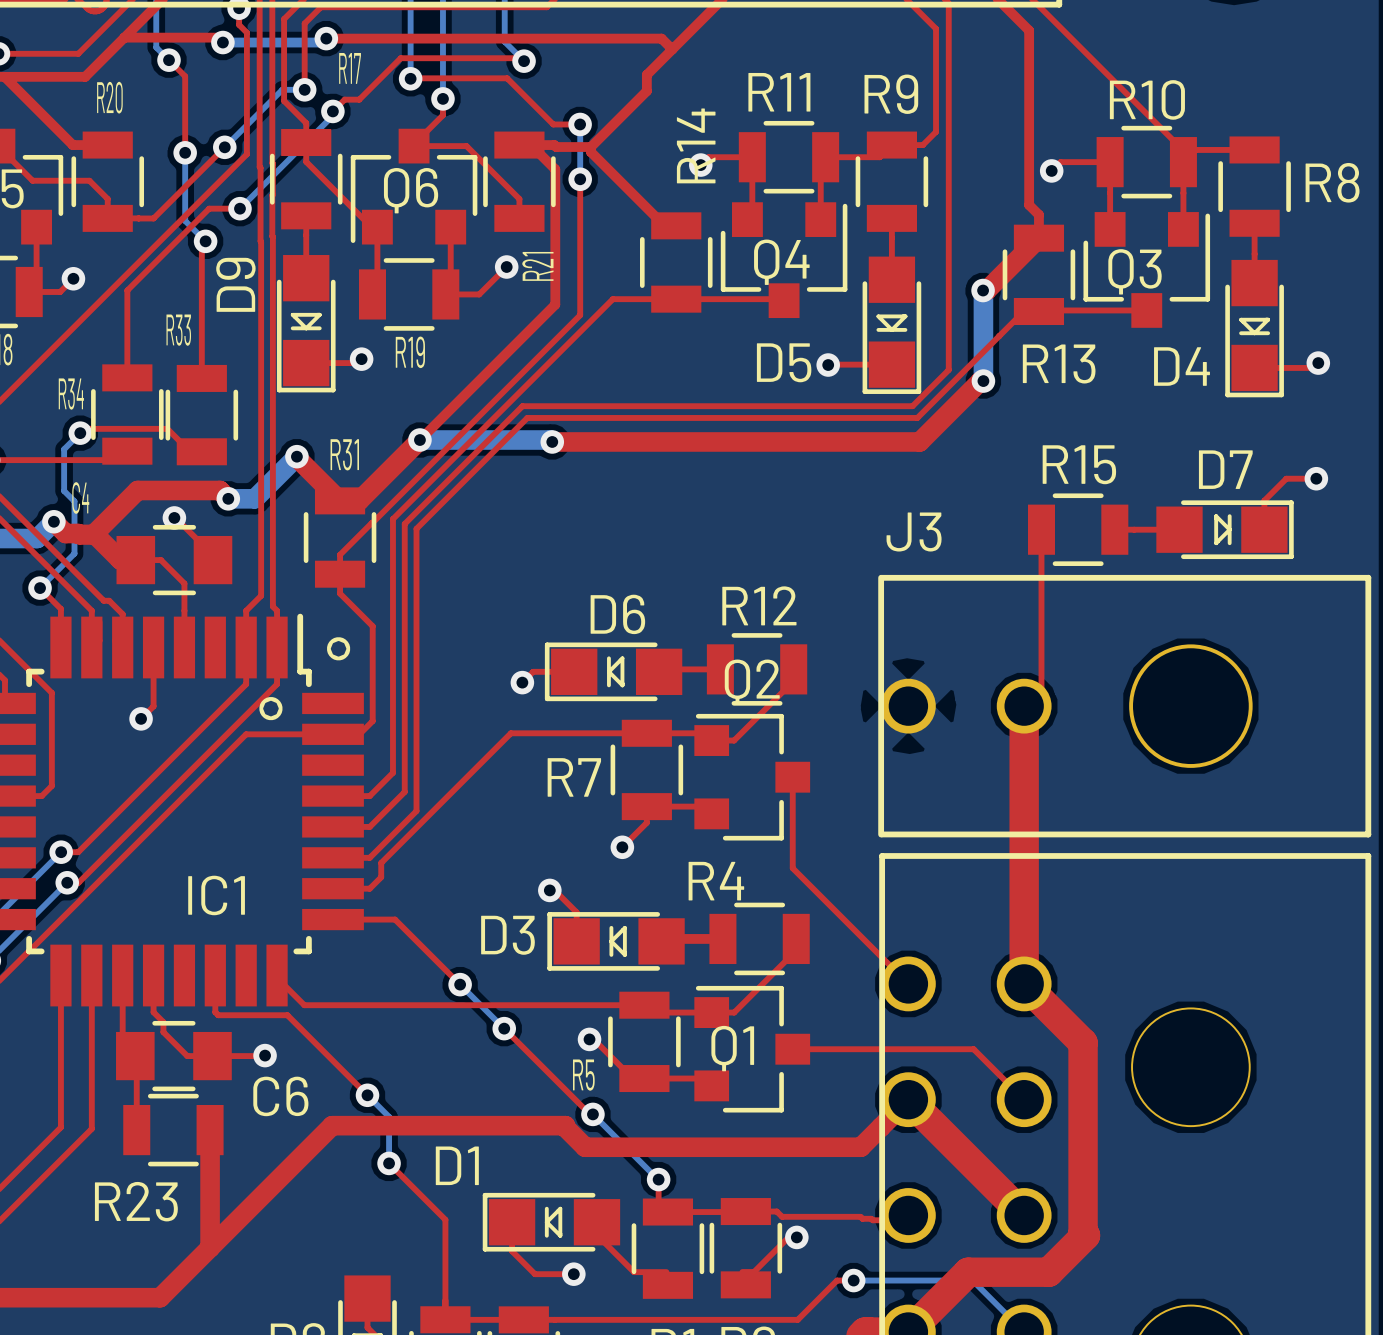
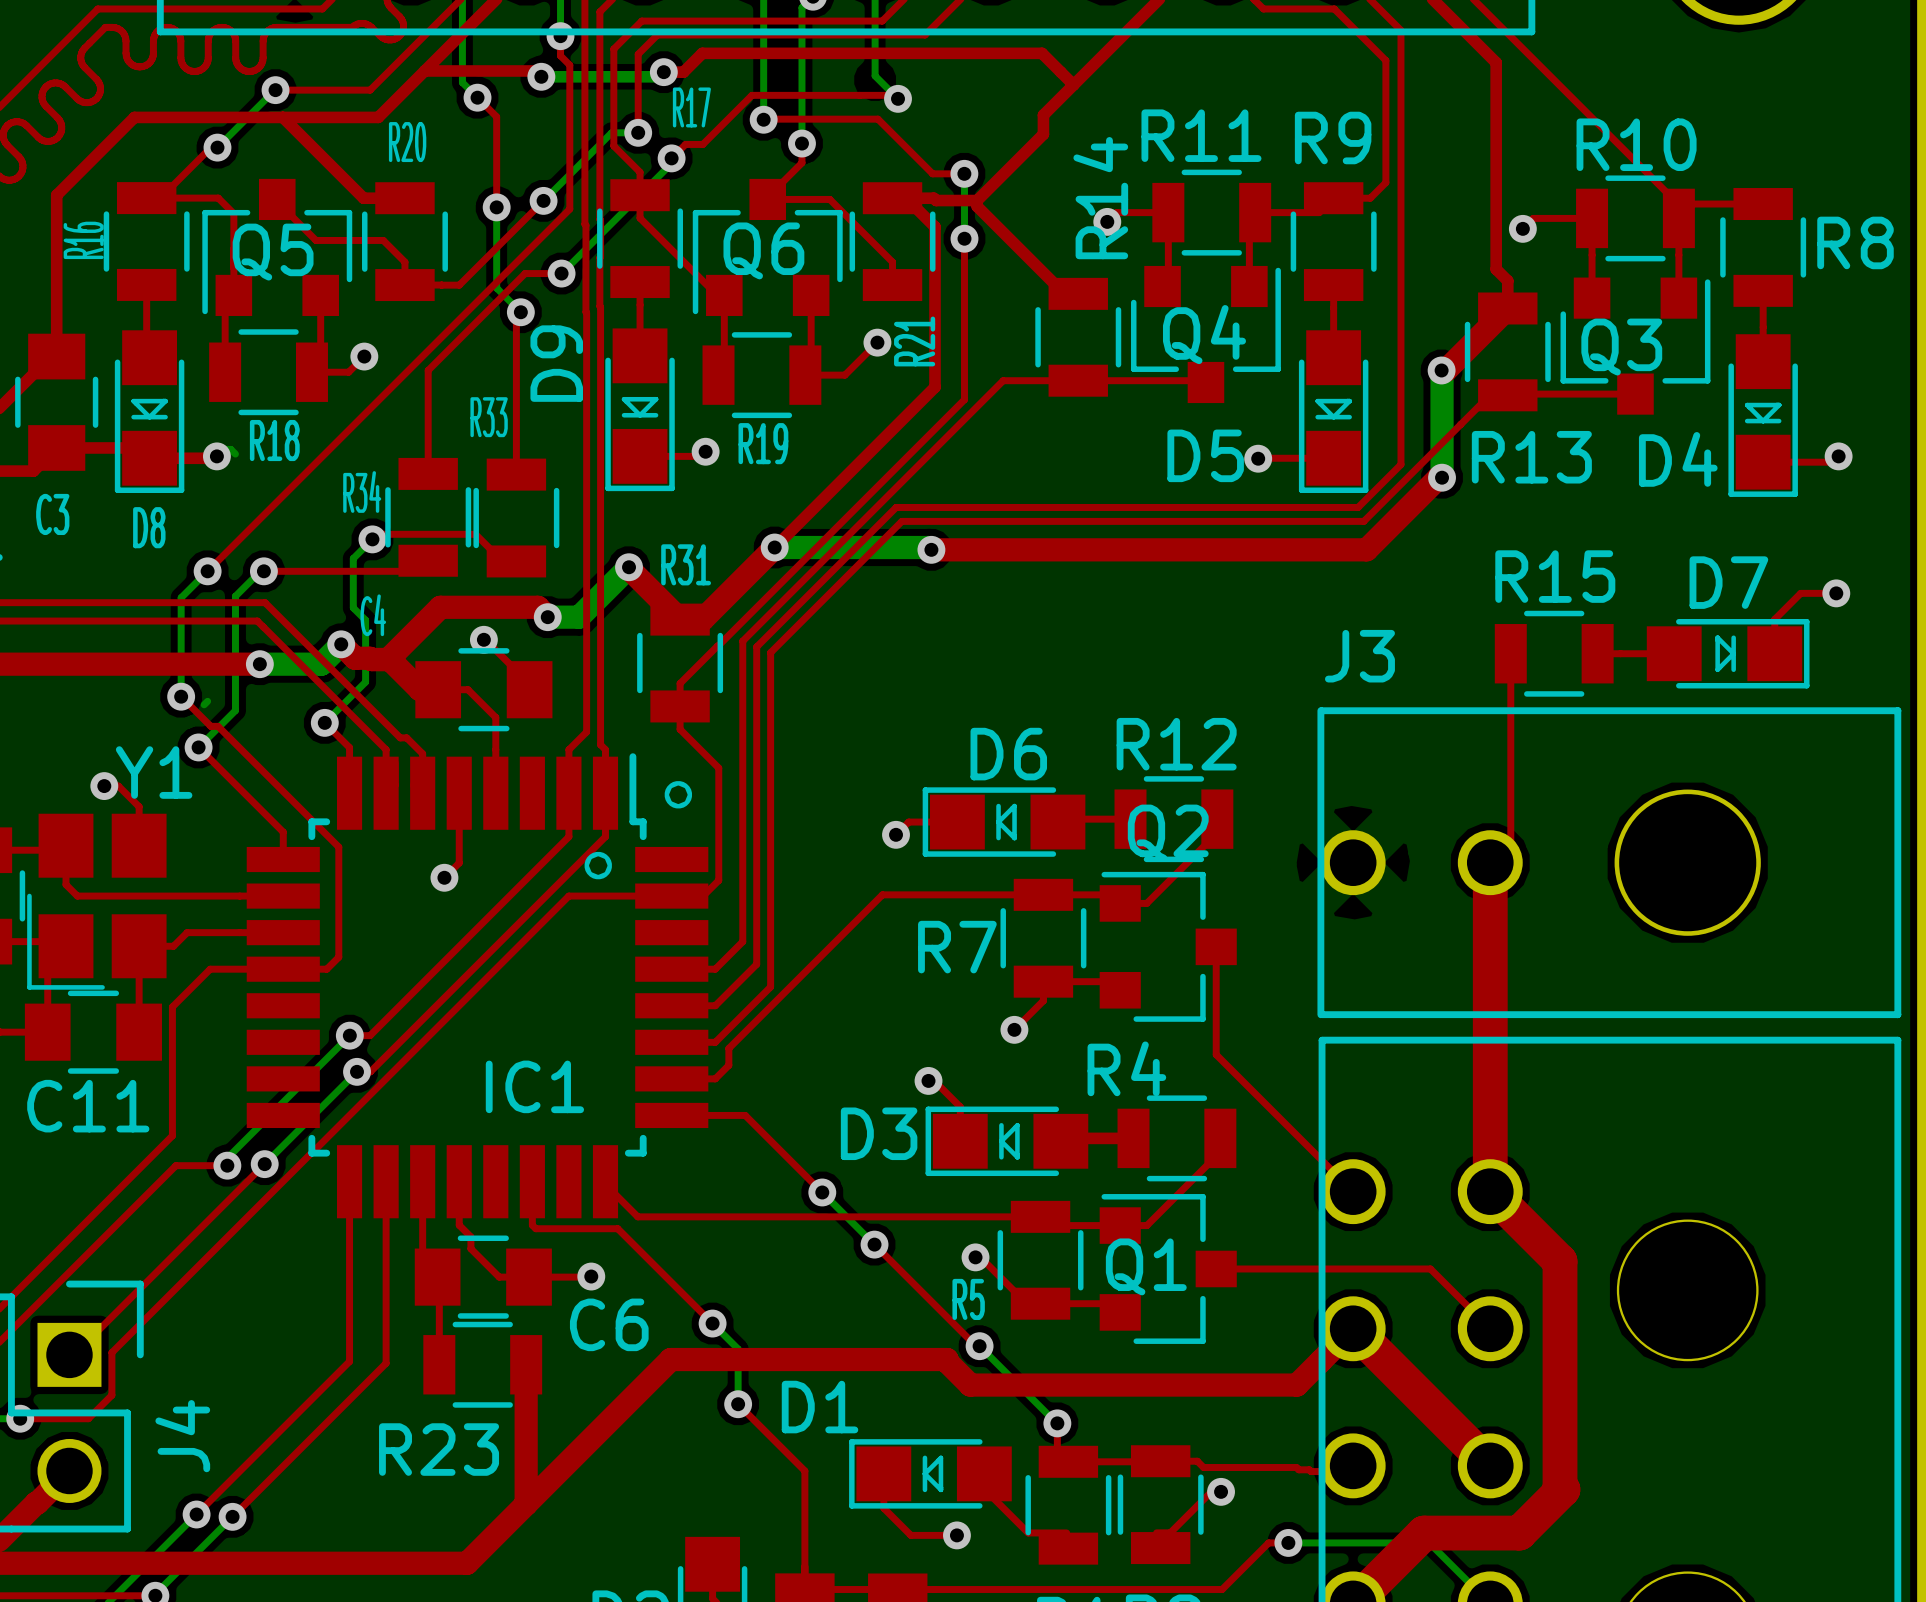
top track: (342, 38) (661, 38) -> (683, 72) (702, 53) (1042, 53) (1060, 72)

